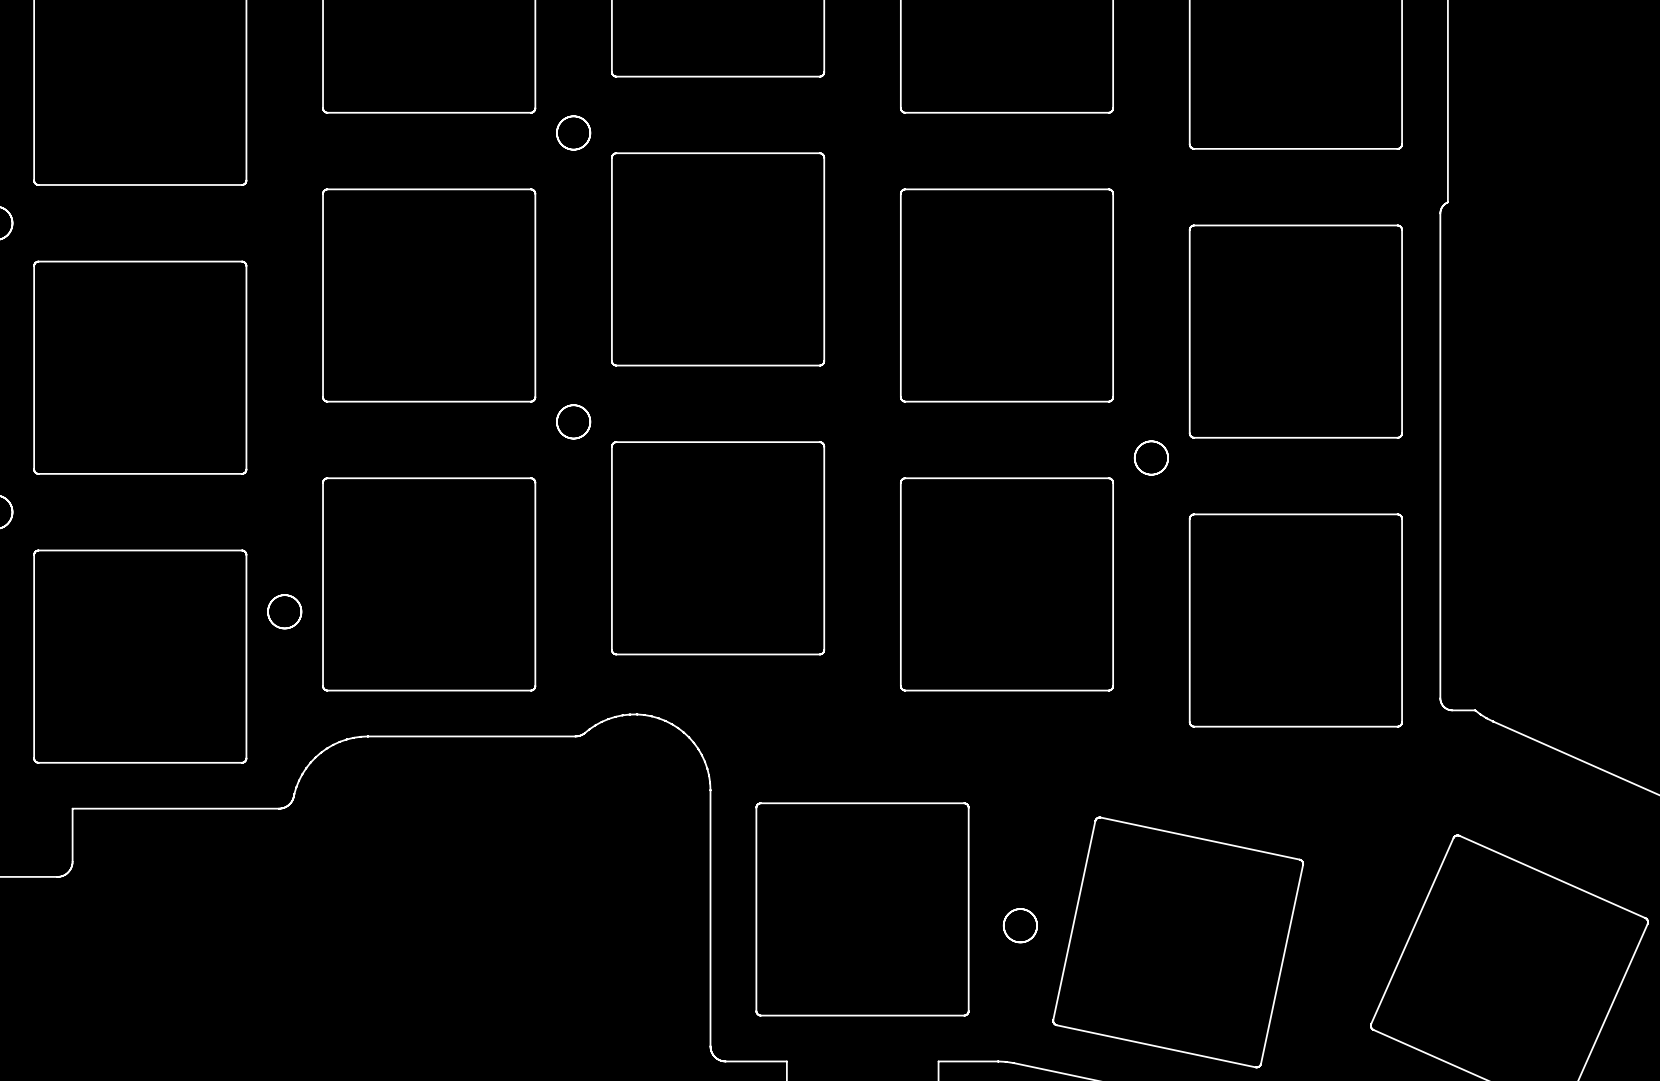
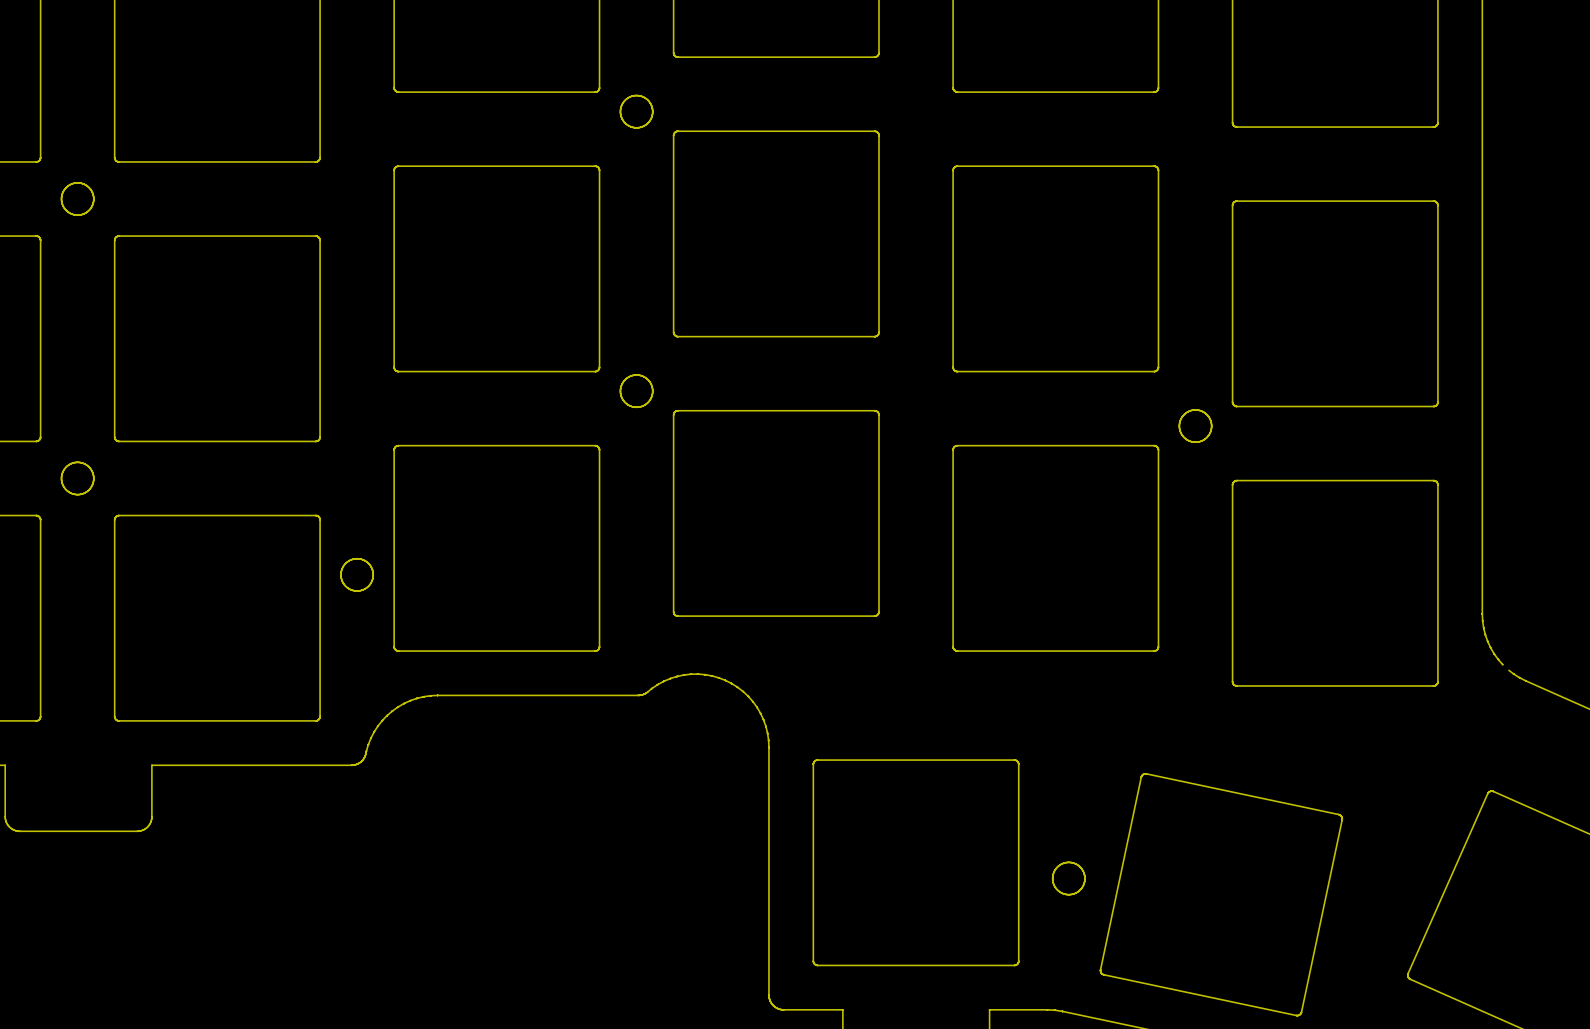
board edge: (1447, 202) (1442, 207) (1440, 213) (1440, 699) (1443, 705) (1448, 709) (1474, 710) -> (1482, 178) (1482, 613)
board edge: none -> (1482, 614) (1482, 620)
board edge: none -> (1482, 620) (1483, 627)
board edge: none -> (1483, 627) (1485, 634)
board edge: none -> (1485, 634) (1487, 641)
board edge: none -> (1487, 641) (1490, 647)
board edge: none -> (1490, 647) (1494, 653)
board edge: none -> (1494, 653) (1498, 659)
board edge: none -> (1498, 659) (1502, 664)

